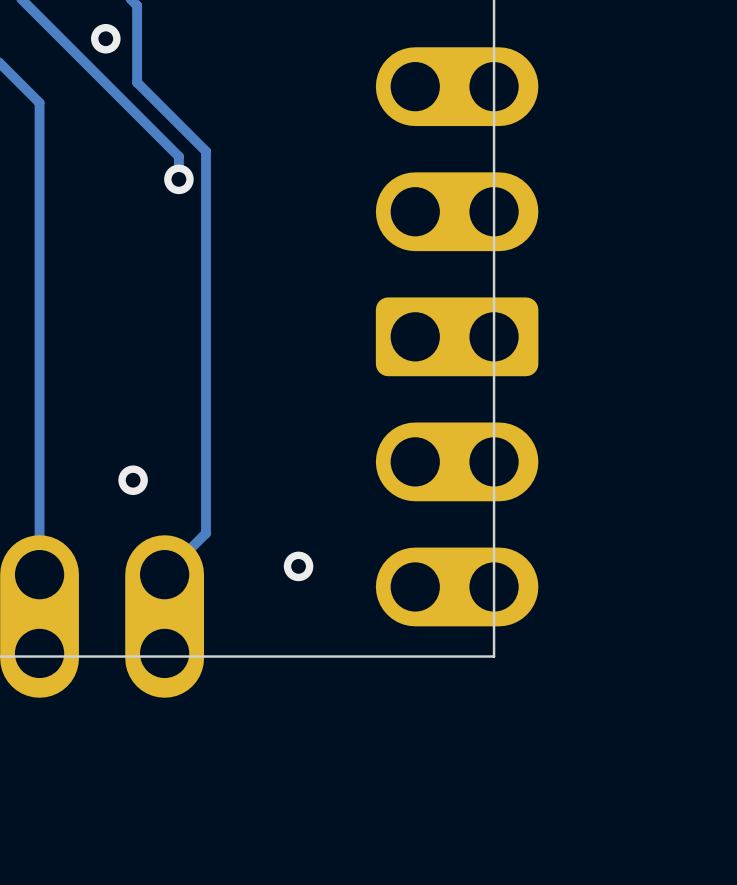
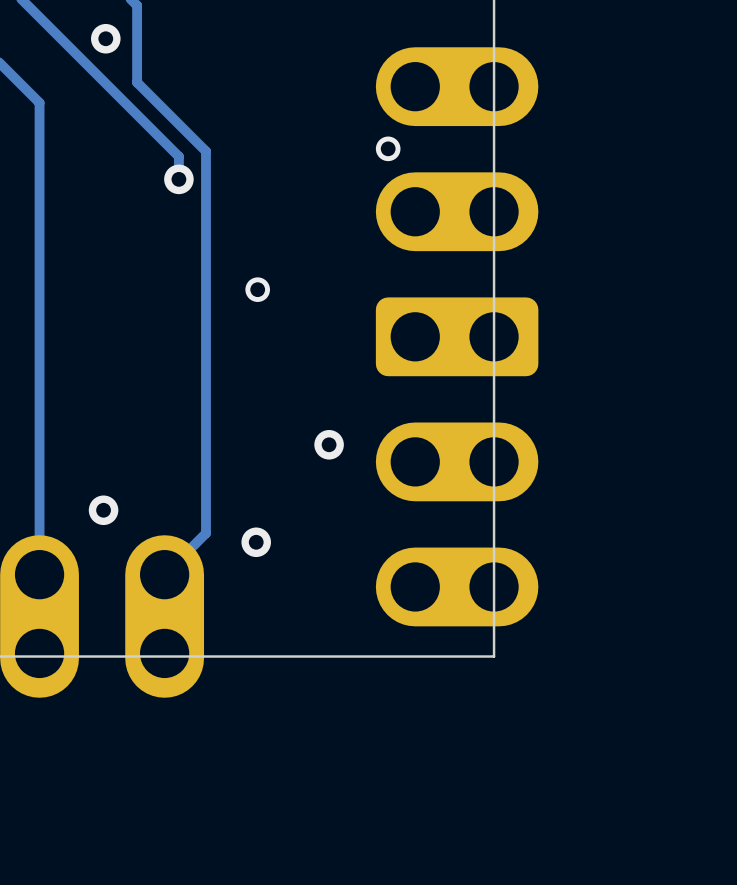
via: none -> (388, 148)
via: none -> (257, 289)
via: none -> (329, 444)
via position: (133, 480) -> (103, 510)
via position: (298, 566) -> (256, 542)

